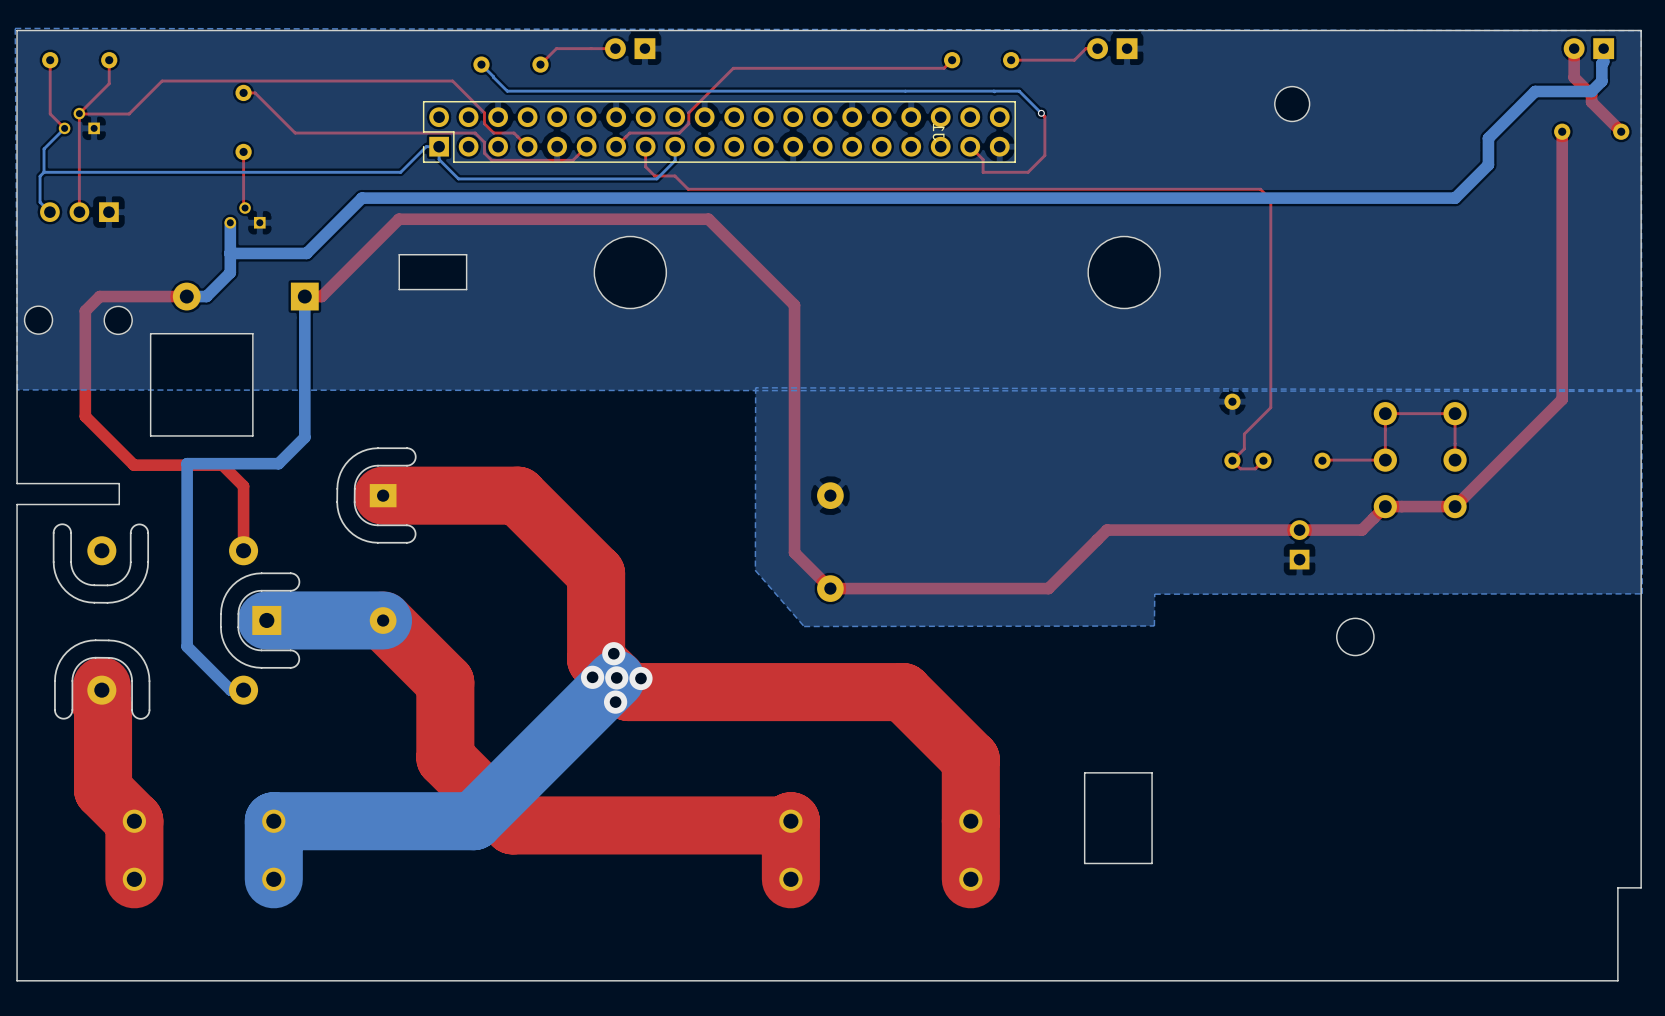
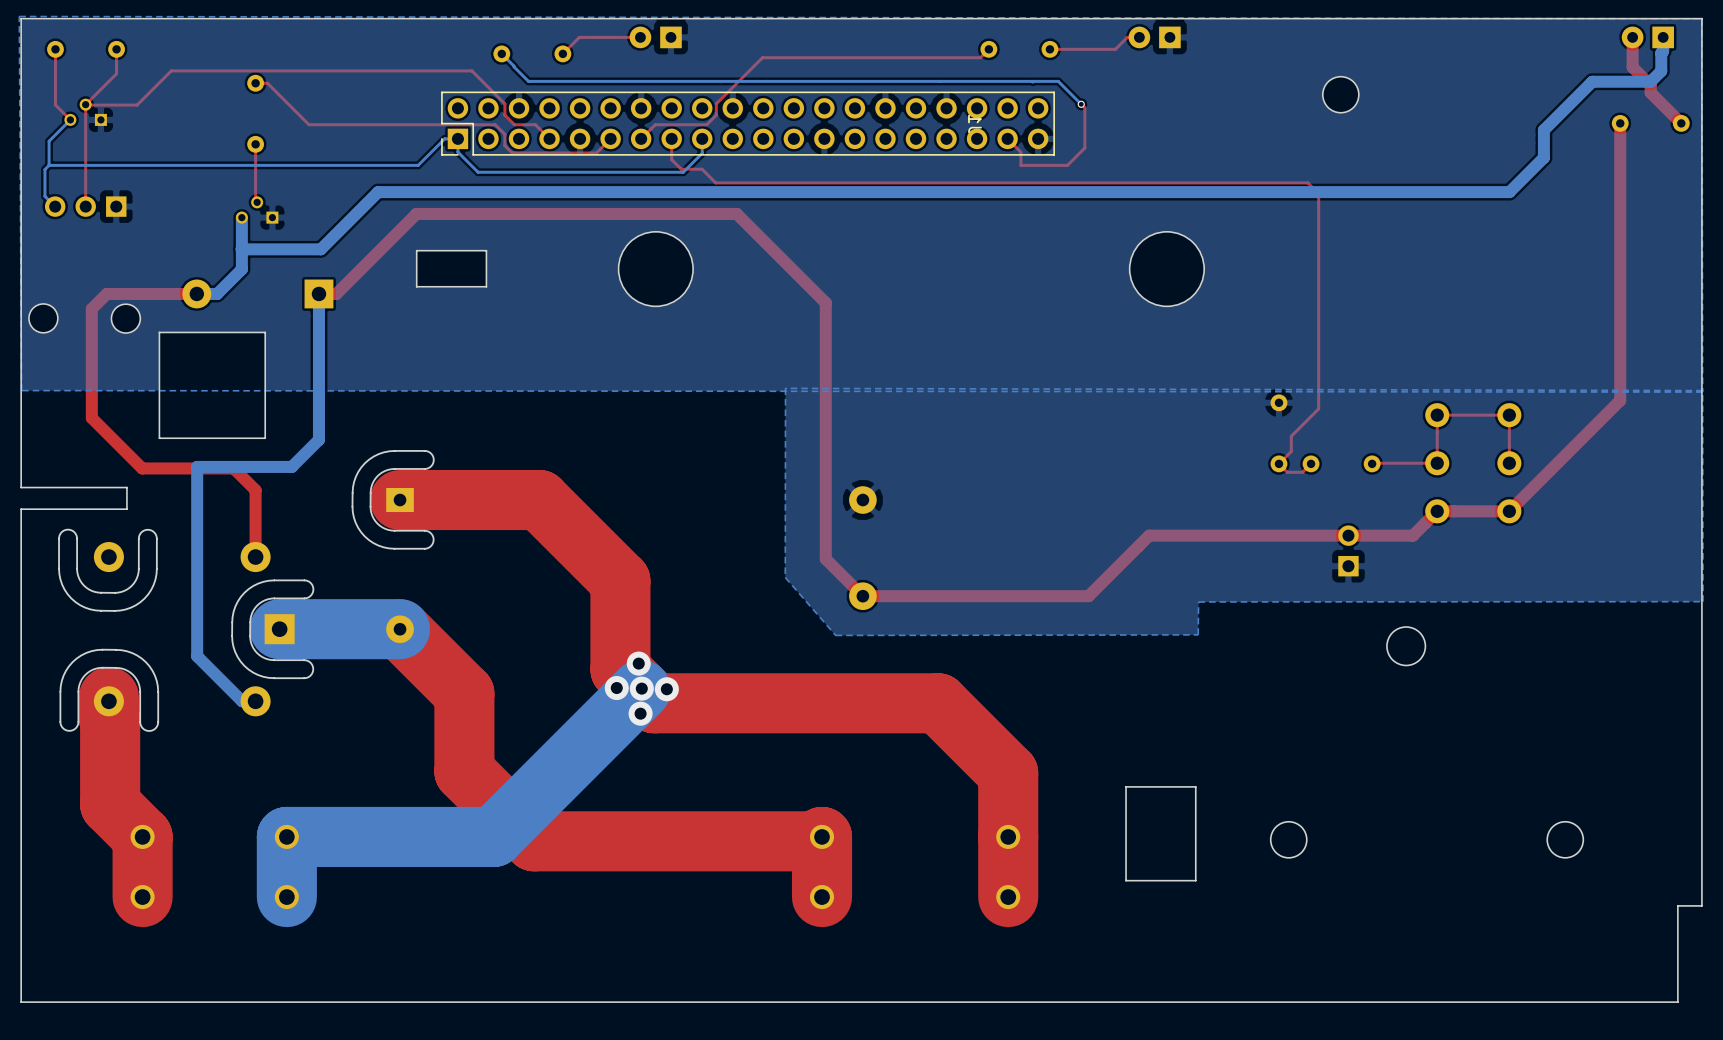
round board edge: none -> [1270, 821, 1308, 859]
round board edge: none -> [1546, 821, 1584, 859]

